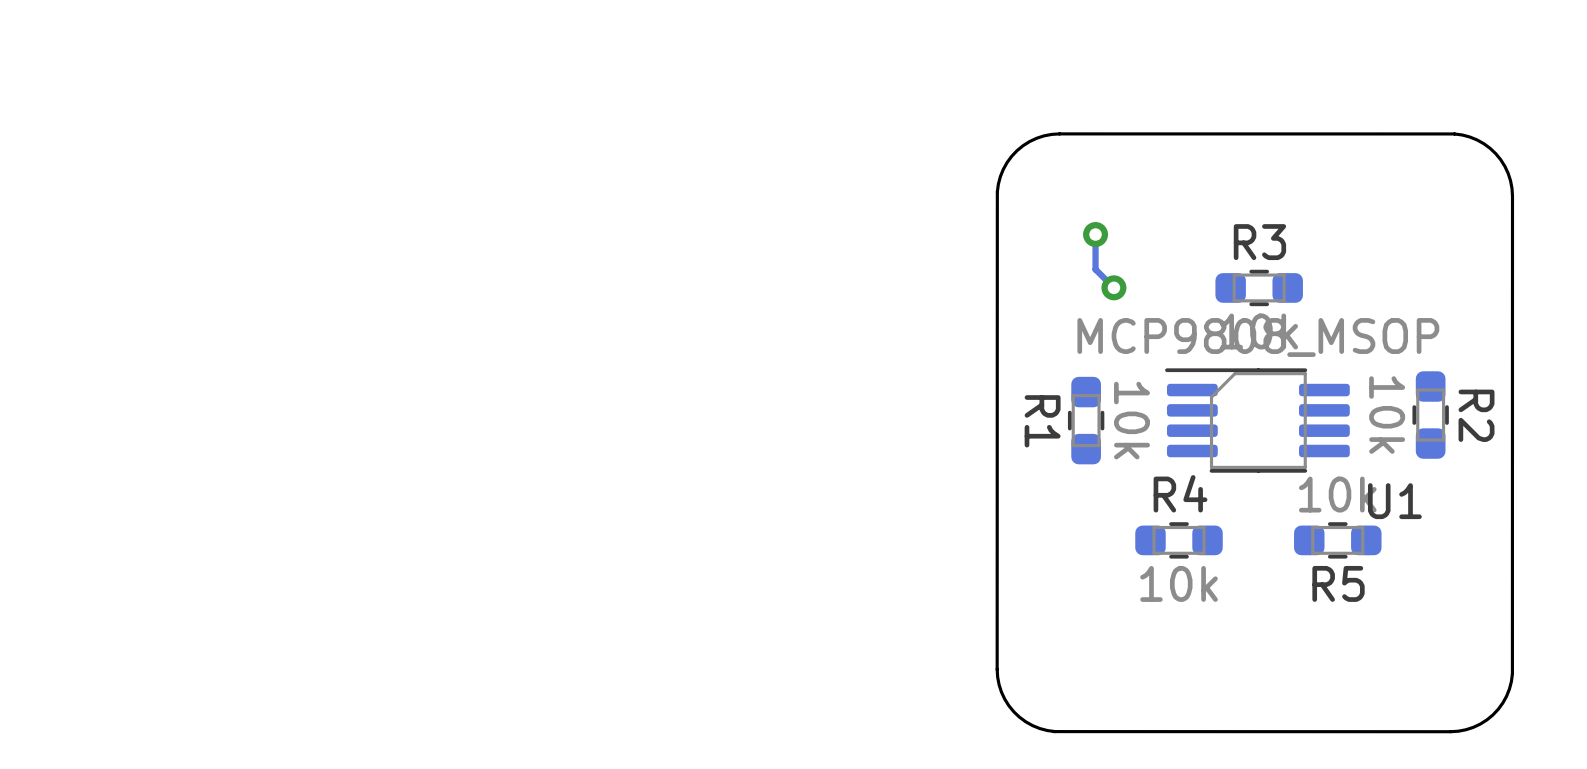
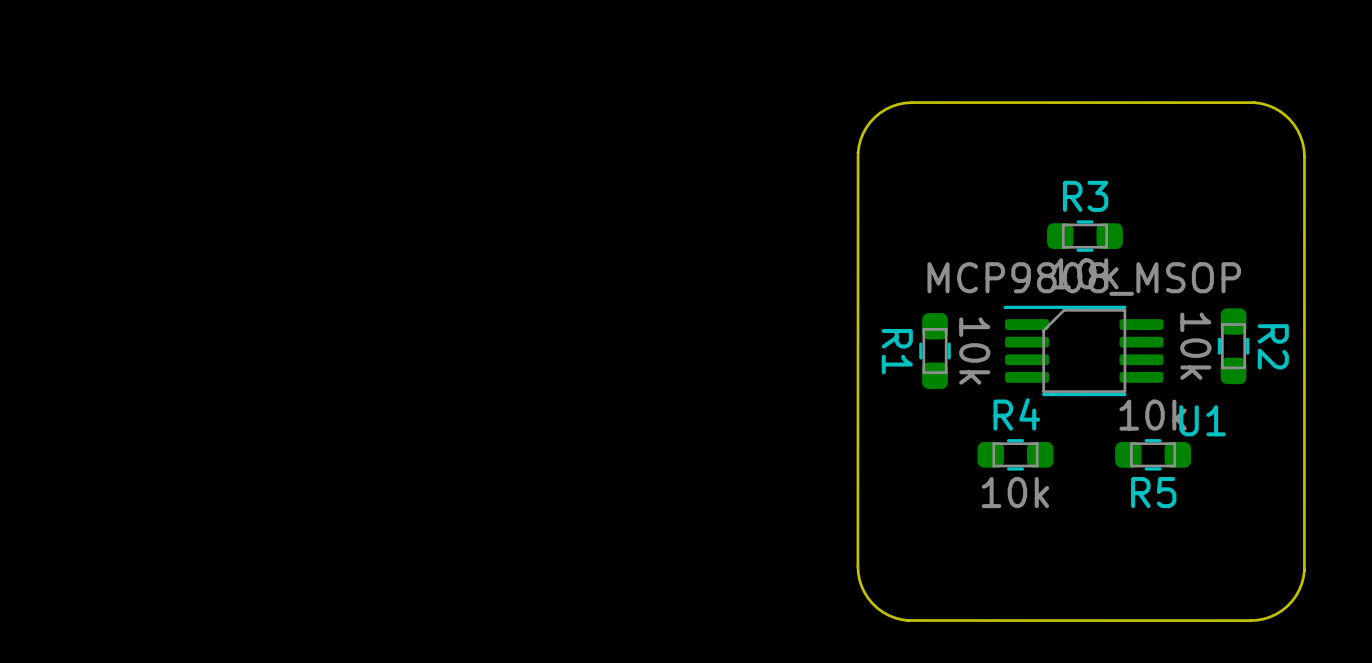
track: (1095, 234) (1095, 269) (1113, 287) -> none
via: (1095, 234) -> none
via: (1113, 287) -> none

